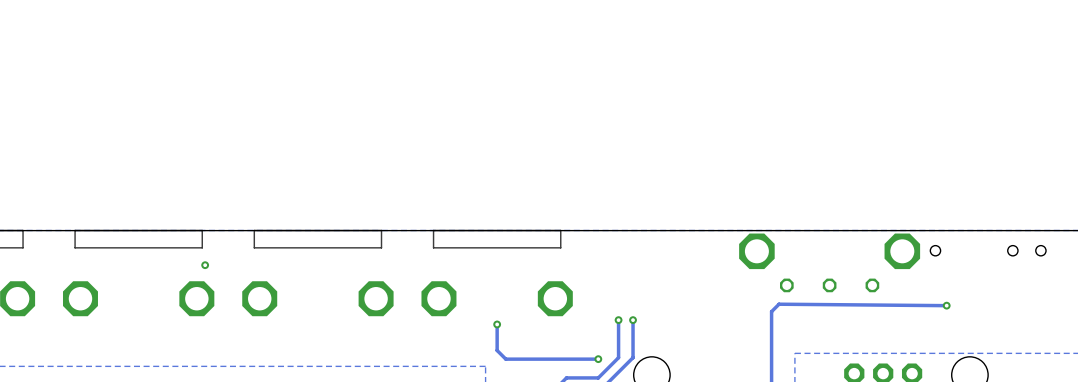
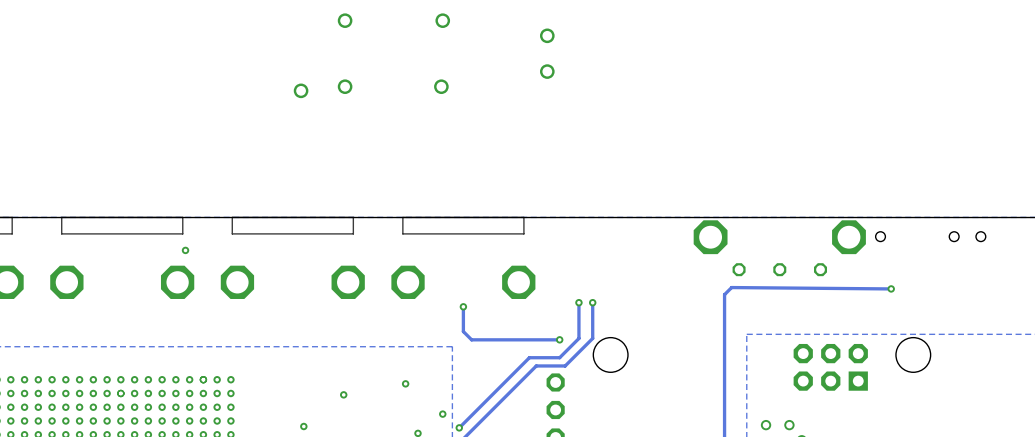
via: none -> (345, 20)
via: none -> (442, 20)
via: none -> (547, 35)
via: none -> (547, 71)
via: none -> (345, 86)
via: none -> (441, 86)
via: none -> (301, 90)

